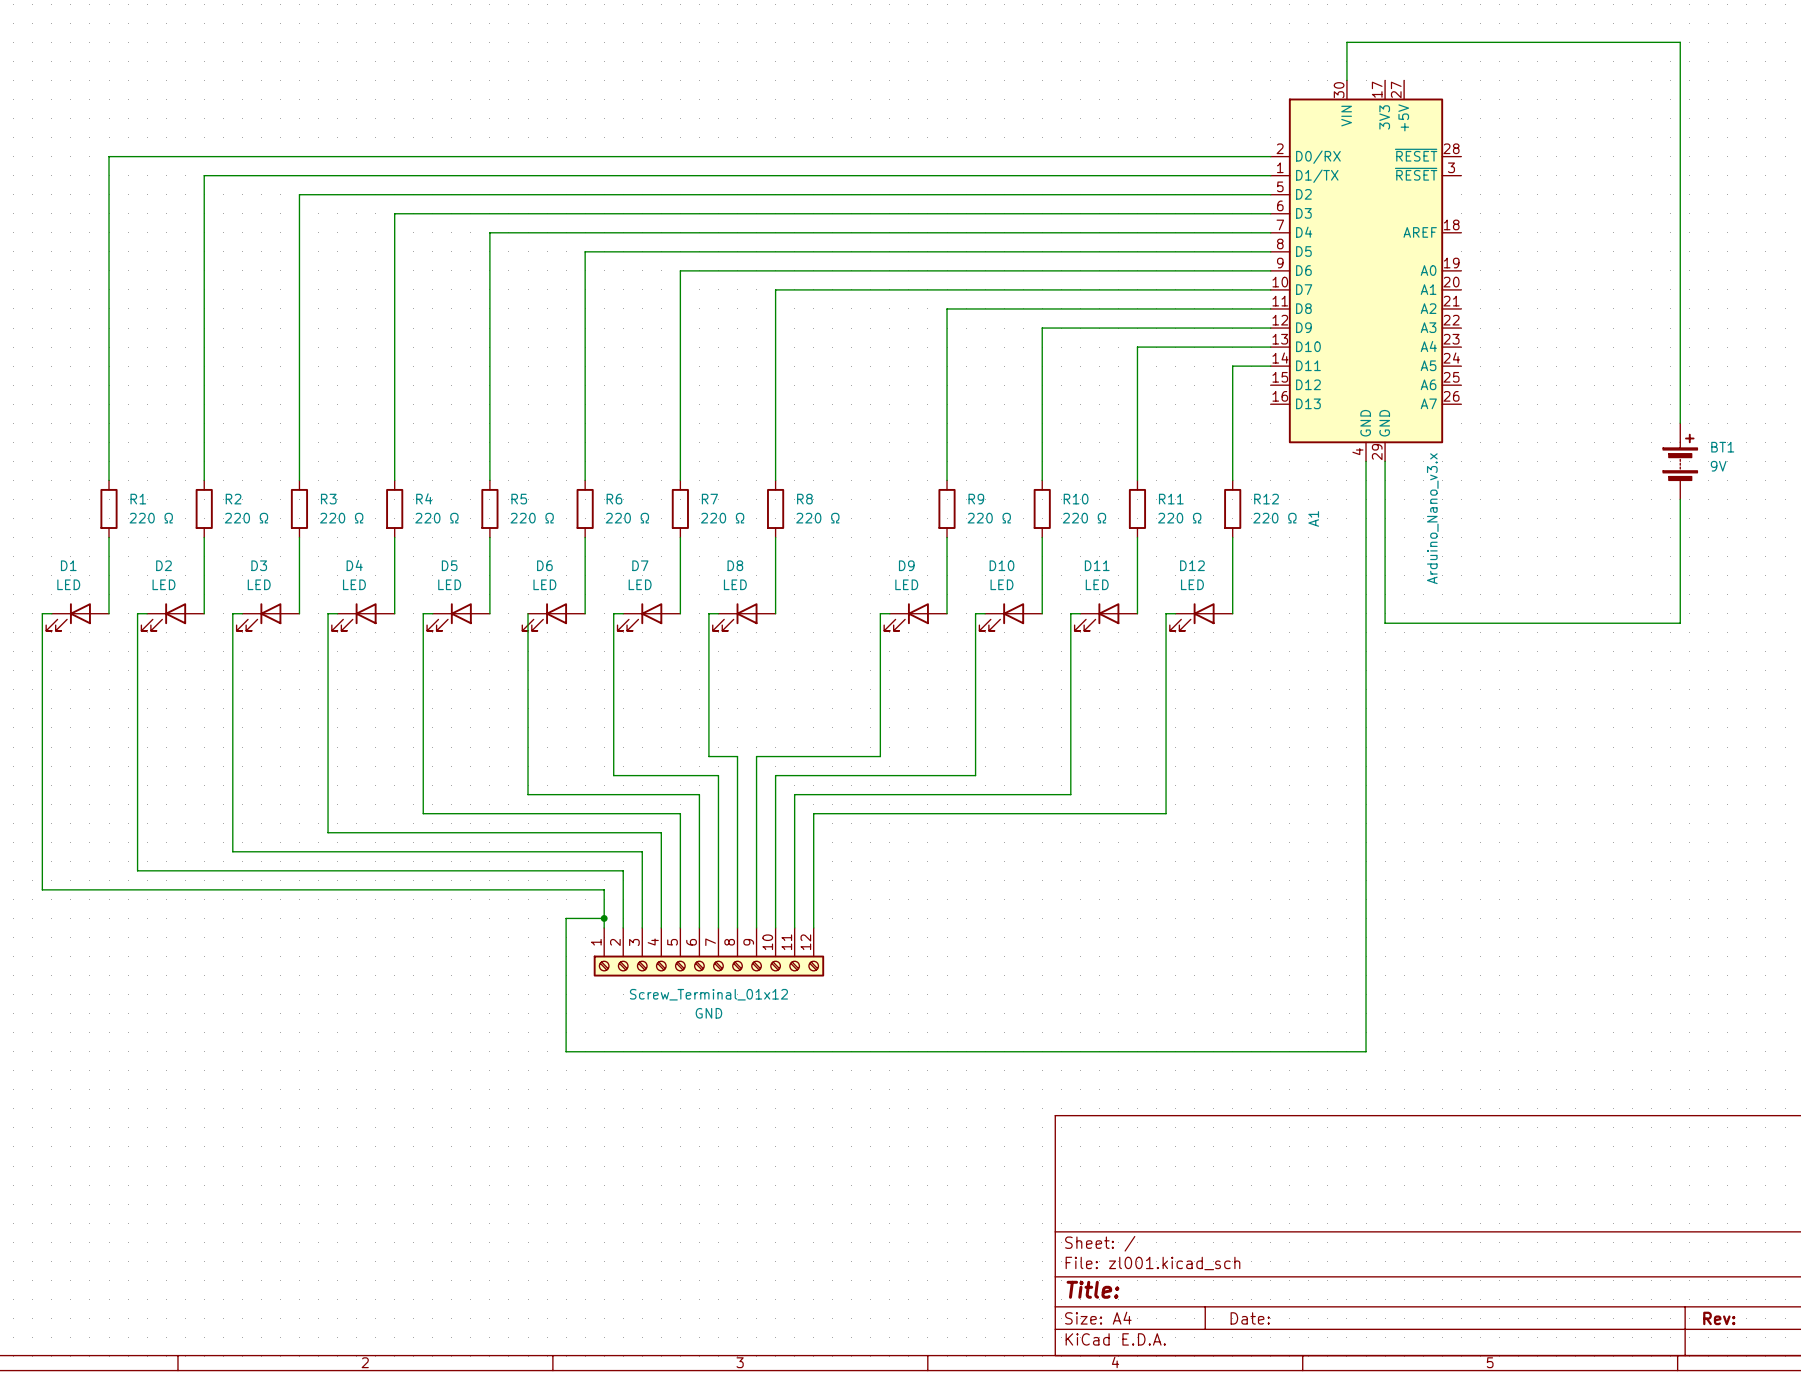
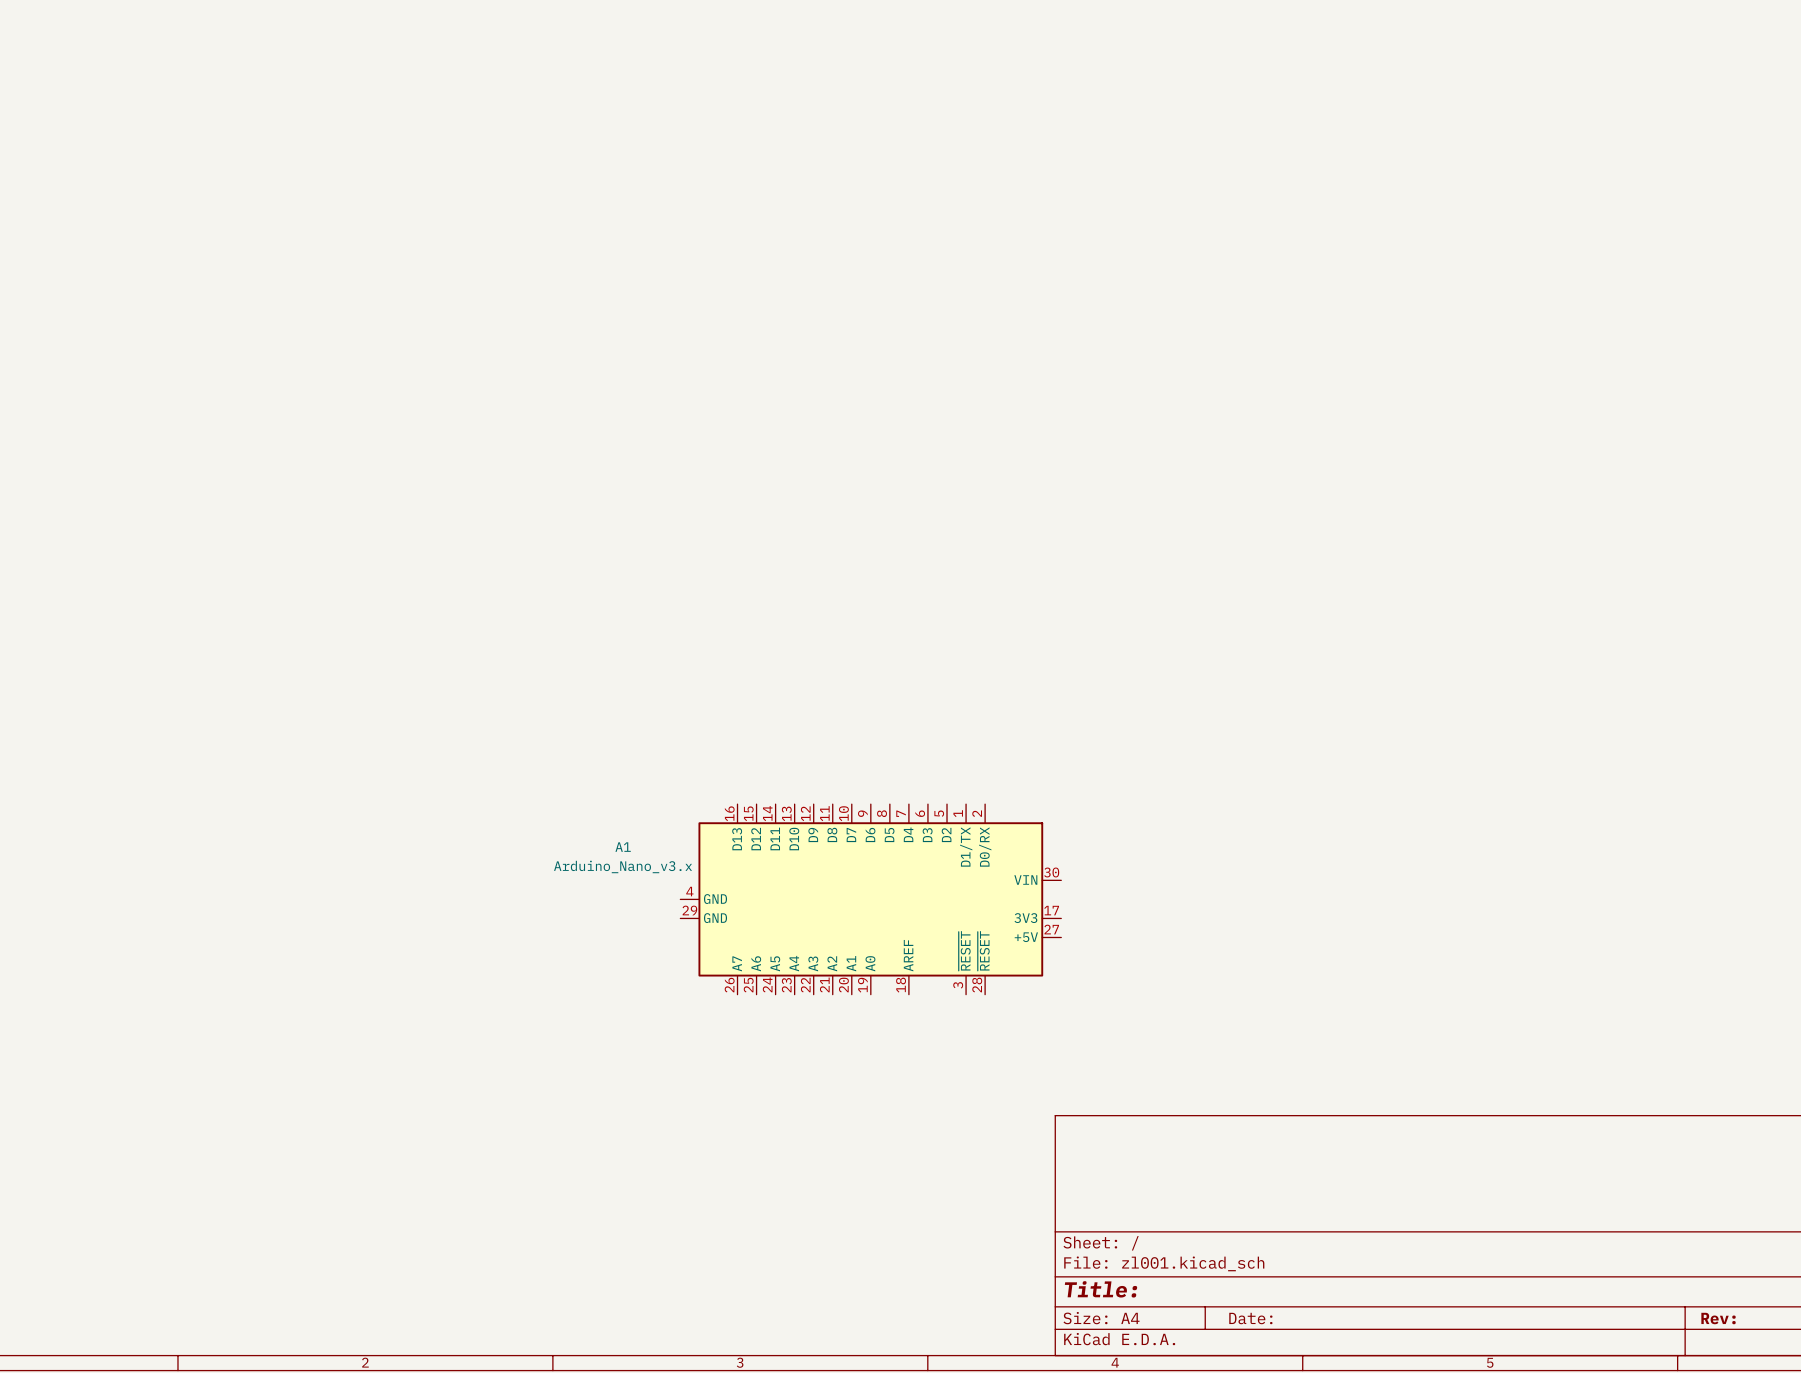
wire: (1346, 80) (1346, 42) (1680, 42) (1680, 423) -> none
wire: (1270, 156) (109, 156) (109, 480) -> none
wire: (1270, 175) (204, 175) (204, 480) -> none
wire: (1270, 194) (299, 194) (299, 480) -> none
wire: (1270, 213) (394, 213) (394, 480) -> none
wire: (1270, 232) (489, 232) (489, 480) -> none
wire: (1270, 251) (585, 251) (585, 480) -> none
wire: (1270, 270) (680, 270) (680, 480) -> none
A1 rotation: 0° (1366, 270) -> 90° clockwise (870, 899)
A1 position: (1366, 270) -> (870, 899)
wire: (1270, 289) (775, 289) (775, 480) -> none
wire: (1270, 308) (947, 308) (947, 480) -> none
wire: (1270, 328) (1042, 328) (1042, 480) -> none
wire: (1270, 347) (1137, 347) (1137, 480) -> none
wire: (1270, 366) (1232, 366) (1232, 480) -> none
wire: (1366, 461) (1366, 1051) (566, 1051) (566, 918) (604, 918) -> none
wire: (1385, 461) (1385, 623) (1680, 623) (1680, 499) -> none
BT1: 9V (1680, 461) -> none
R1: 220 Ω (109, 508) -> none
R2: 220 Ω (204, 508) -> none
R3: 220 Ω (299, 508) -> none
R4: 220 Ω (394, 508) -> none
R5: 220 Ω (489, 508) -> none
R6: 220 Ω (585, 508) -> none
R7: 220 Ω (680, 508) -> none
R8: 220 Ω (775, 508) -> none
R9: 220 Ω (947, 508) -> none
R10: 220 Ω (1042, 508) -> none
R11: 220 Ω (1137, 508) -> none
R12: 220 Ω (1232, 508) -> none
A1 value position: Arduino_Nano_v3.x (1432, 518) -> Arduino_Nano_v3.x (623, 866)
wire: (109, 537) (109, 613) -> none
wire: (204, 537) (204, 613) -> none
wire: (299, 537) (299, 613) -> none
wire: (394, 537) (394, 613) -> none
wire: (489, 537) (489, 613) -> none
wire: (585, 537) (585, 613) -> none
wire: (680, 537) (680, 613) -> none
wire: (775, 537) (775, 613) -> none
wire: (947, 537) (947, 613) -> none
wire: (1042, 537) (1042, 613) -> none
wire: (1137, 537) (1137, 613) -> none
wire: (1232, 537) (1232, 613) -> none
wire: (51, 613) (42, 613) (42, 889) (604, 889) (604, 927) -> none
wire: (147, 613) (137, 613) (137, 870) (623, 870) (623, 927) -> none
wire: (242, 613) (232, 613) (232, 851) (642, 851) (642, 927) -> none
wire: (337, 613) (328, 613) (328, 832) (661, 832) (661, 927) -> none
wire: (432, 613) (423, 613) (423, 813) (680, 813) (680, 927) -> none
wire: (528, 613) (528, 794) (699, 794) (699, 927) -> none
wire: (623, 613) (613, 613) (613, 775) (718, 775) (718, 927) -> none
wire: (718, 613) (708, 613) (708, 756) (737, 756) (737, 927) -> none
wire: (889, 613) (880, 613) (880, 756) (756, 756) (756, 927) -> none
wire: (985, 613) (975, 613) (975, 775) (775, 775) (775, 927) -> none
wire: (1080, 613) (1070, 613) (1070, 794) (794, 794) (794, 927) -> none
wire: (1175, 613) (1166, 613) (1166, 813) (813, 813) (813, 927) -> none
D1: LED (77, 617) -> none
D2: LED (172, 617) -> none
D3: LED (268, 617) -> none
D4: LED (363, 617) -> none
D5: LED (458, 617) -> none
D6: LED (553, 617) -> none
D7: LED (648, 617) -> none
D8: LED (744, 617) -> none
D9: LED (915, 617) -> none
D10: LED (1010, 617) -> none
D11: LED (1106, 617) -> none
D12: LED (1201, 617) -> none
junction: (604, 918) -> none
GND: Screw_Terminal_01x12 (708, 952) -> none

